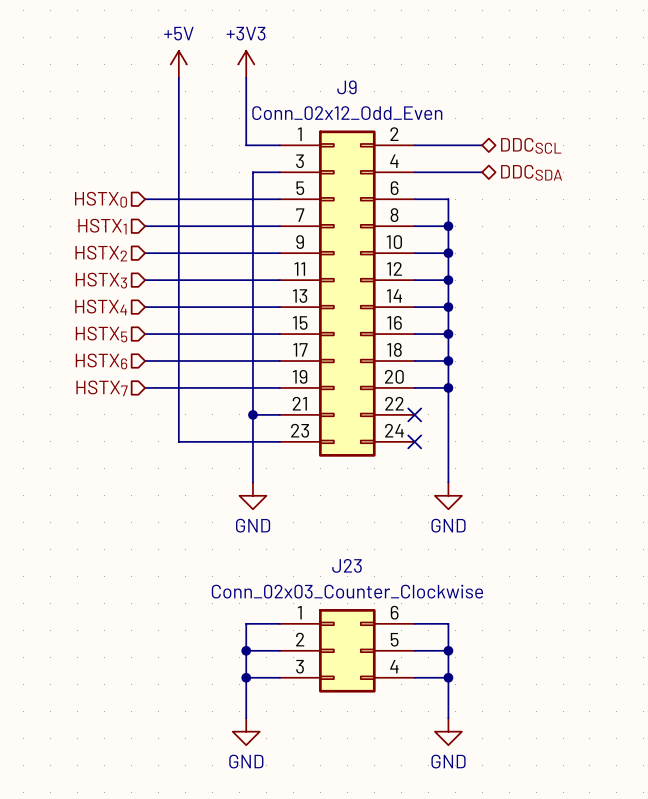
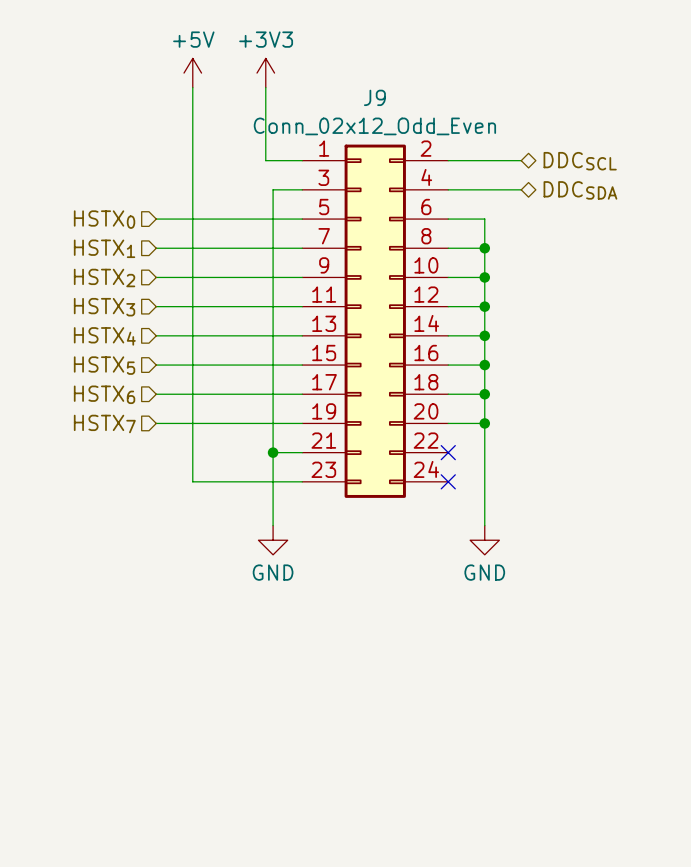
wire: (279, 623) (246, 623) (246, 718) -> none
wire: (414, 623) (448, 623) (448, 718) -> none
wire: (246, 650) (279, 650) -> none
junction: (246, 650) -> none
J23: Conn_02x03_Counter_Clockwise (347, 650) -> none
wire: (414, 650) (448, 650) -> none
junction: (448, 650) -> none
wire: (246, 677) (279, 677) -> none
junction: (246, 677) -> none
wire: (414, 677) (448, 677) -> none
junction: (448, 677) -> none
power symbol: GND (246, 731) -> none
power symbol: GND (448, 731) -> none

